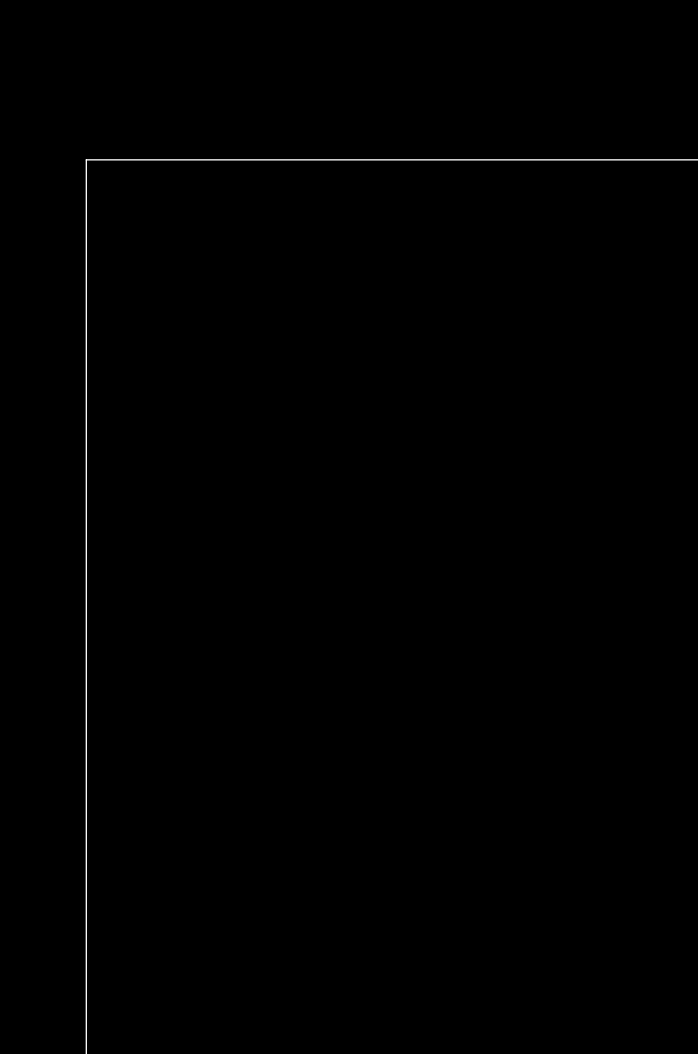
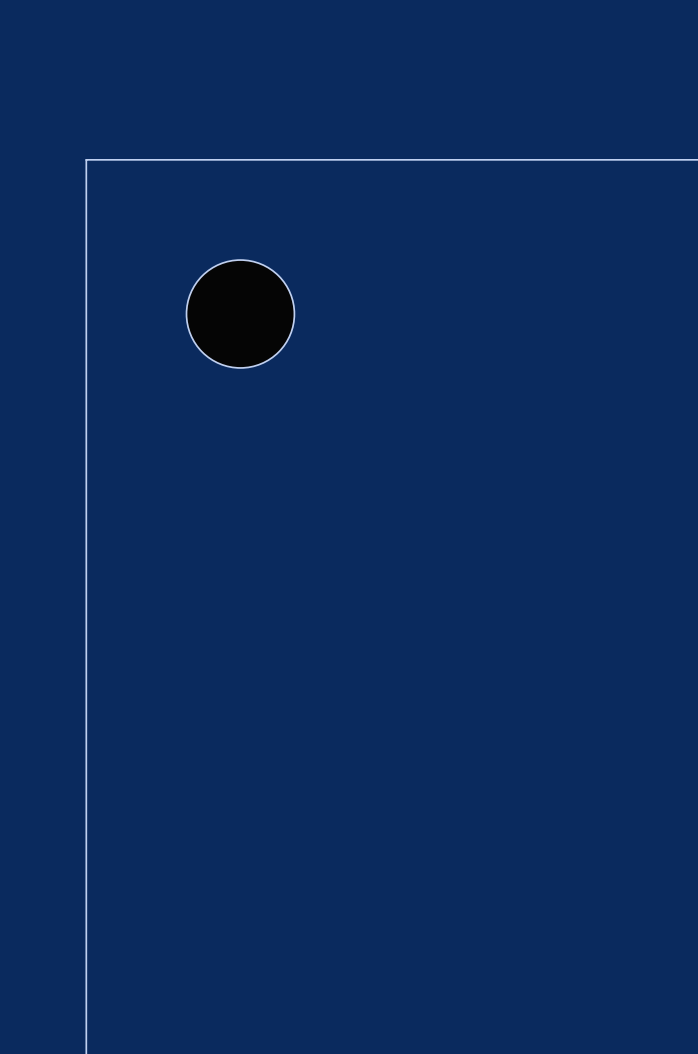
part: none -> (240, 314)

